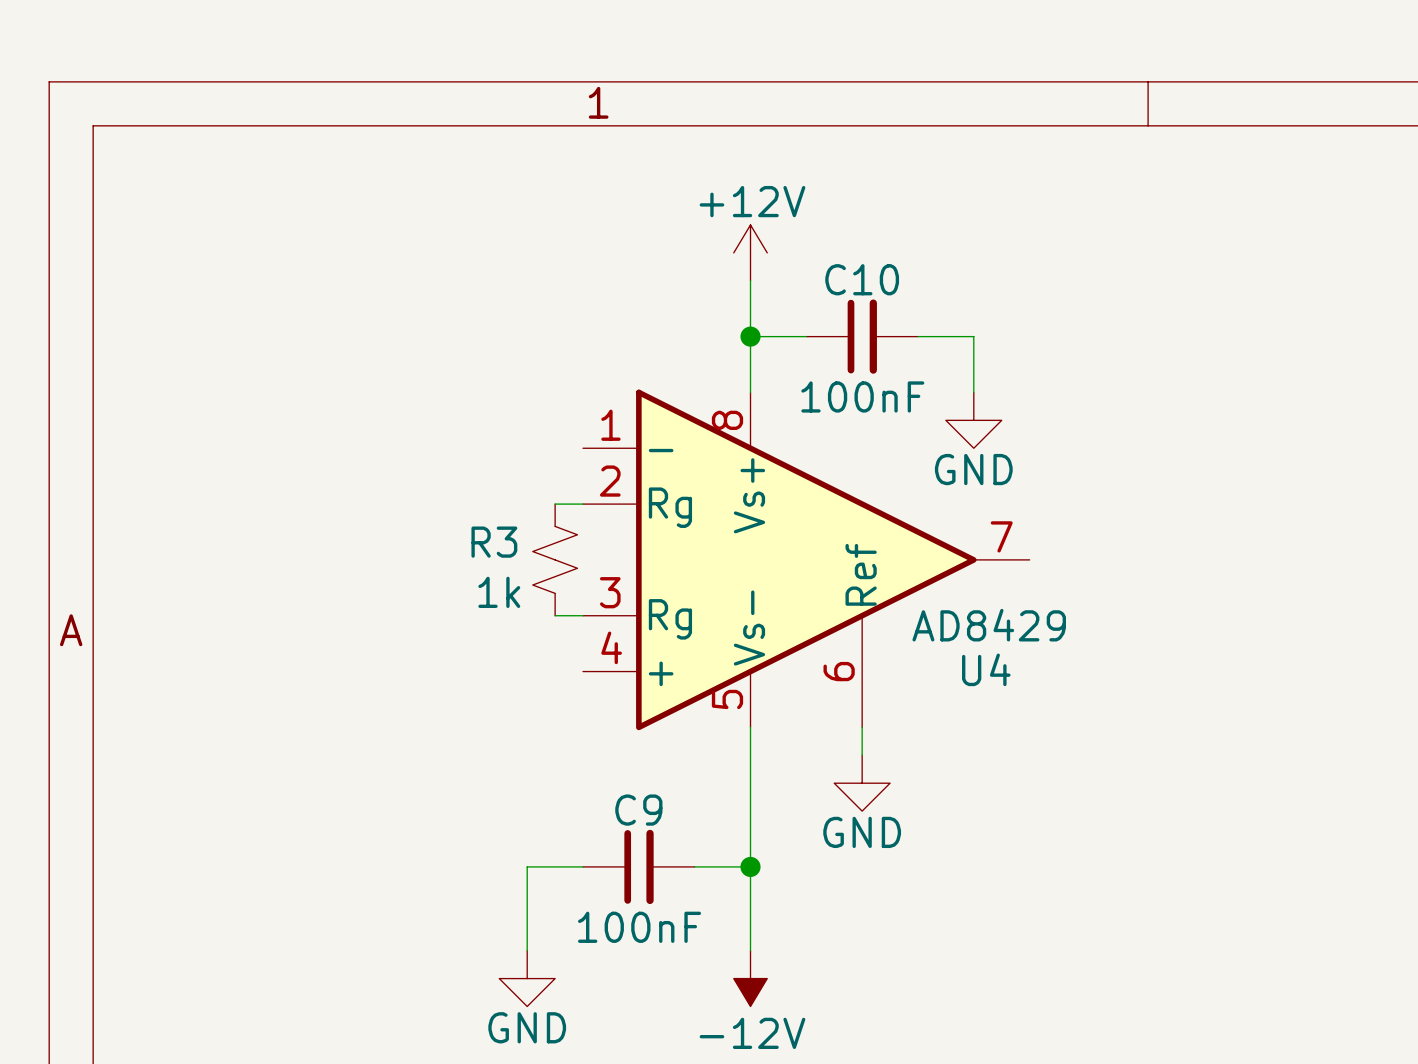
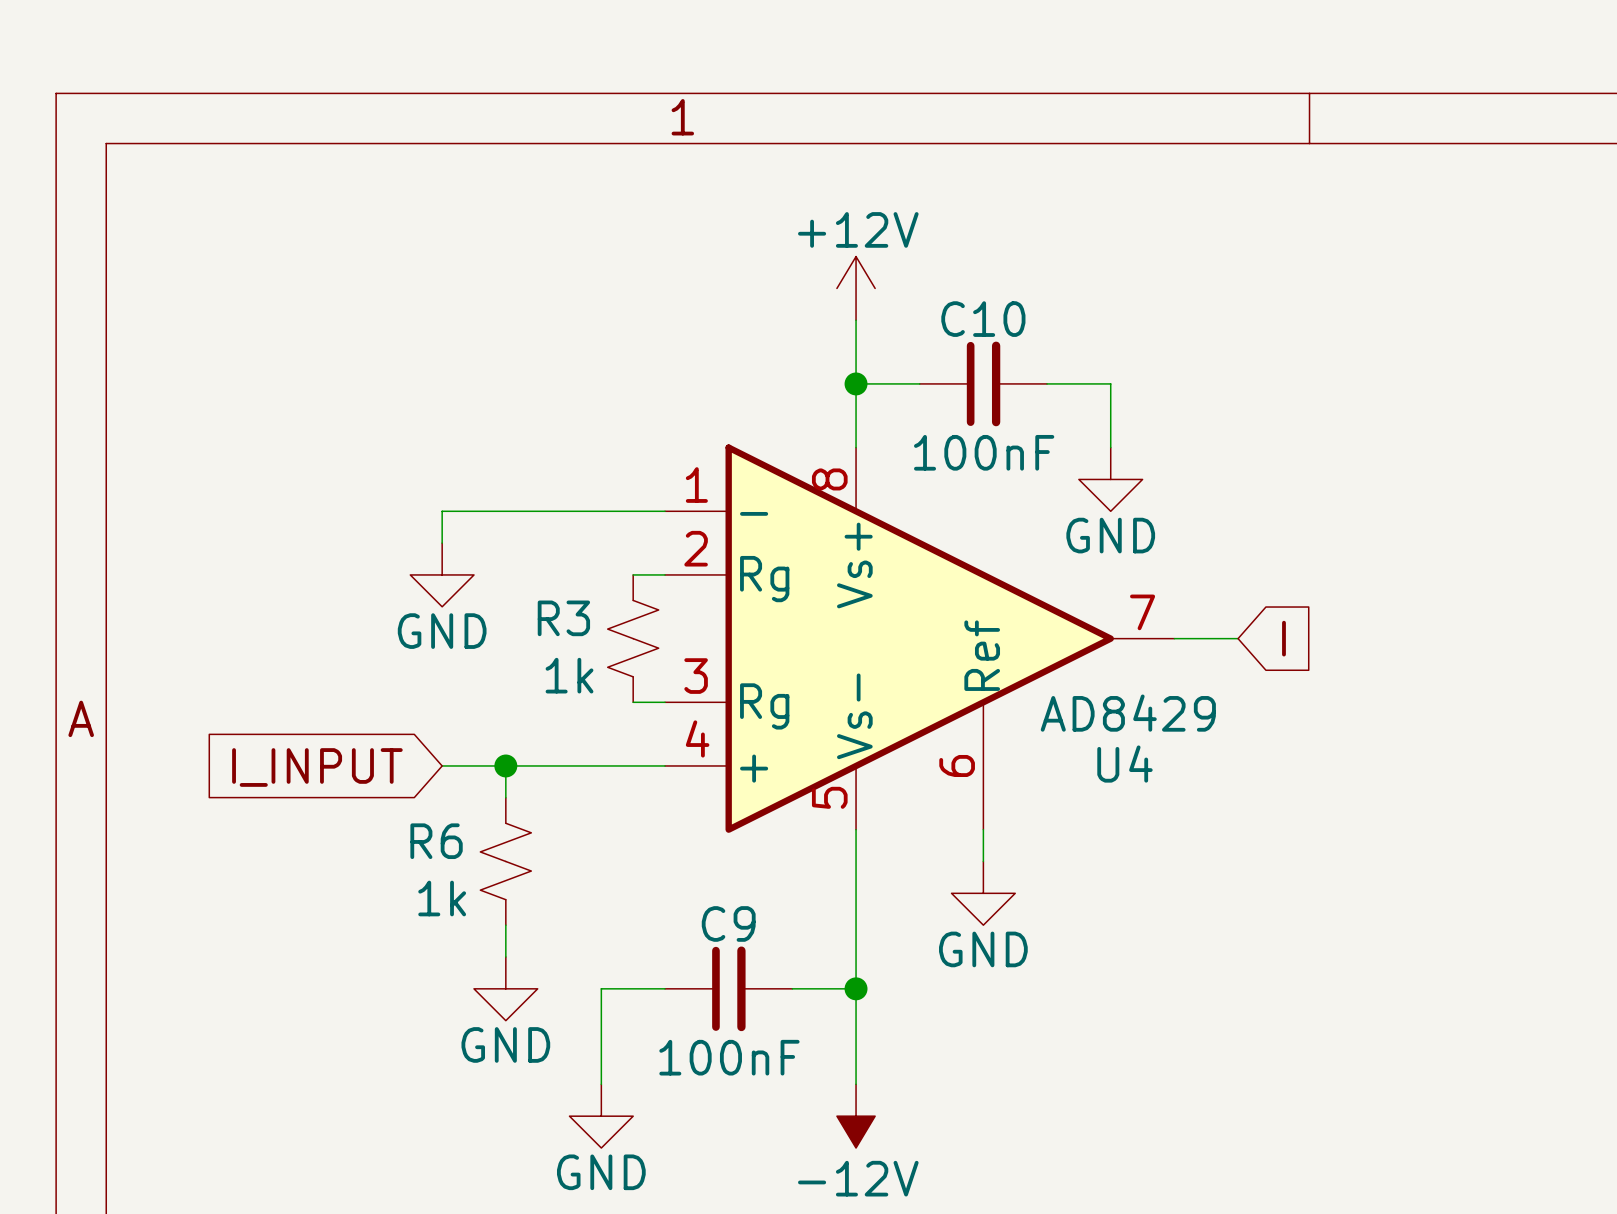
wire: none -> (665, 511) (442, 511) (442, 543)
power symbol: none -> GND (442, 574)
wire: none -> (1174, 638) (1238, 638)
global label: none -> I (1283, 638)
wire: none -> (442, 765) (665, 765)
wire: none -> (505, 765) (505, 797)
junction: none -> (505, 765)
global label: none -> I_INPUT (317, 767)
R6: none -> 1k (505, 861)
wire: none -> (505, 925) (505, 957)
power symbol: none -> GND (505, 988)

